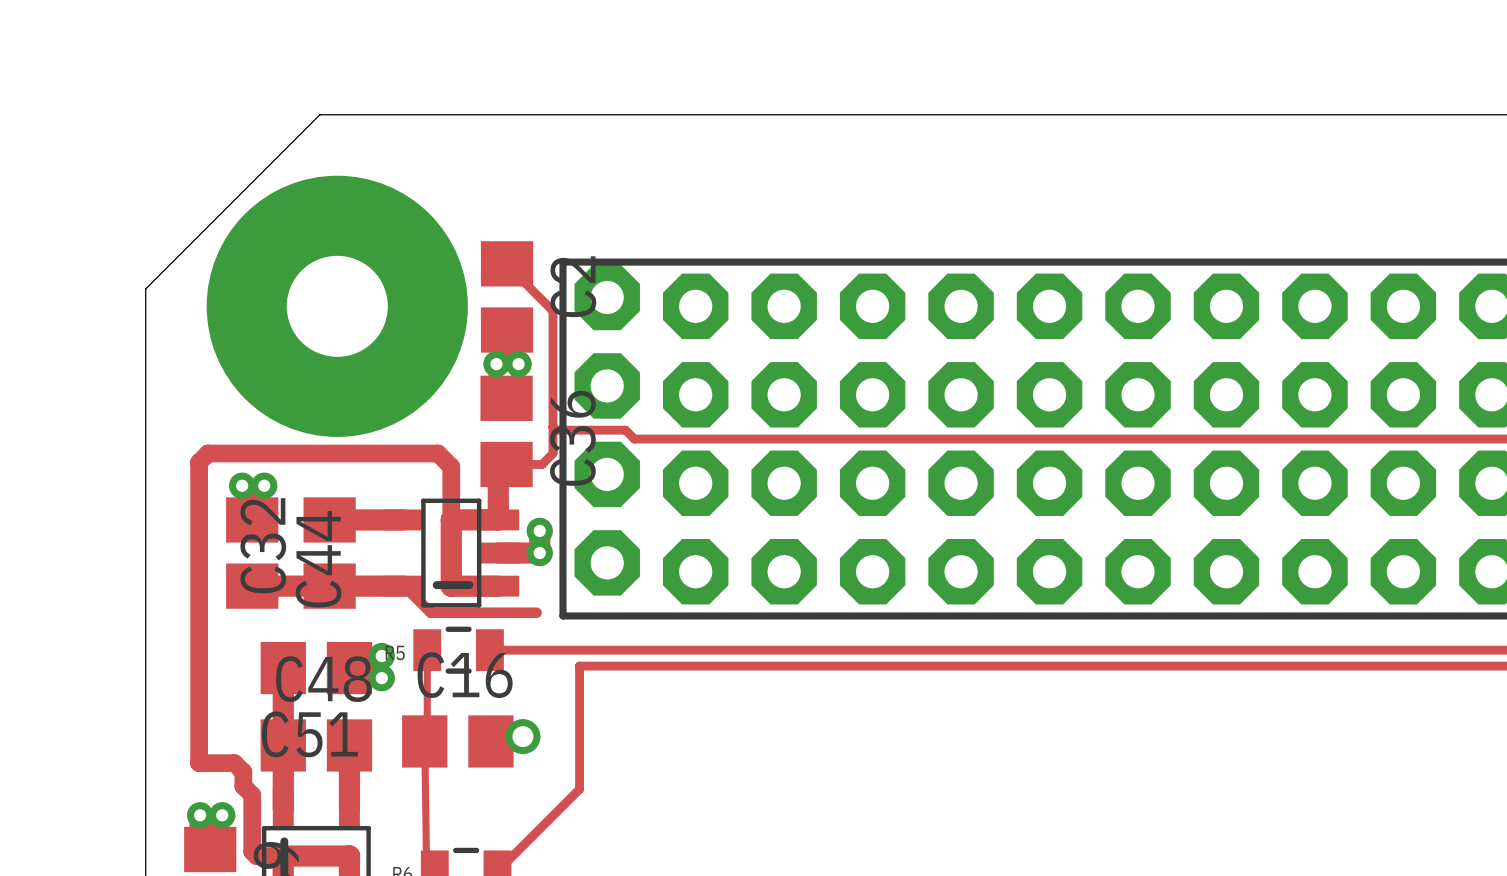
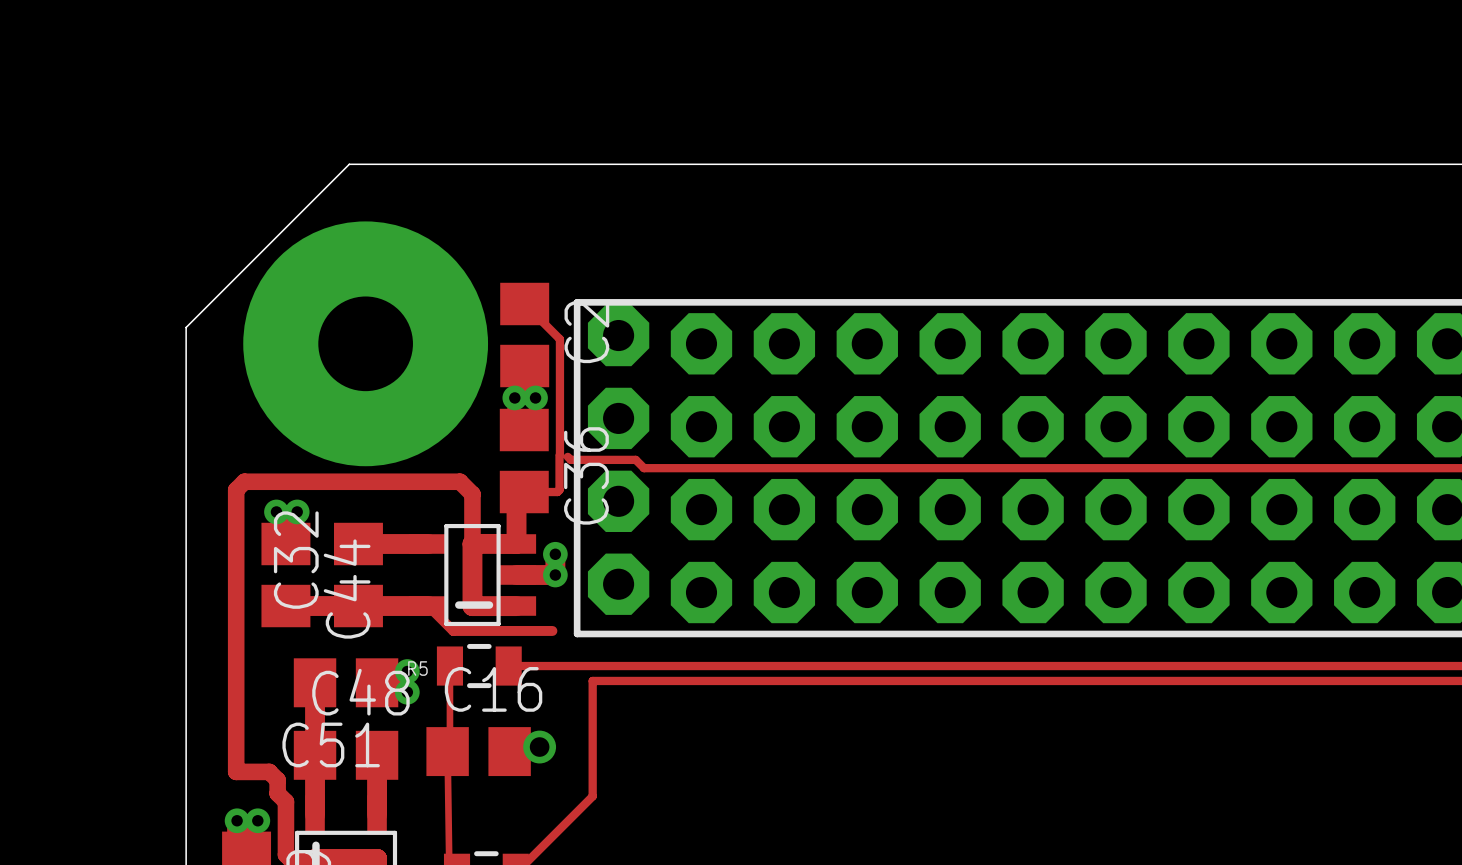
top track: (507, 263) (553, 310) (553, 453) (544, 462) -> (524, 304) (559, 339) (559, 455)
top track: none -> (559, 455) (559, 490)

